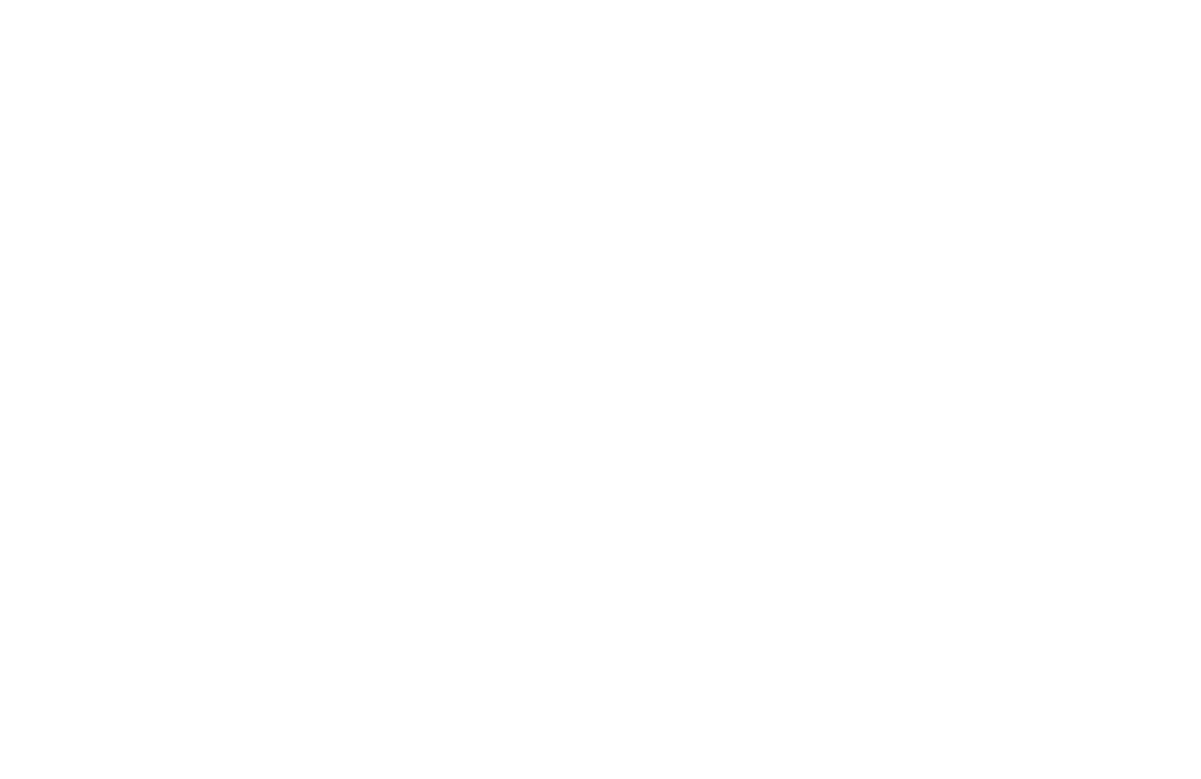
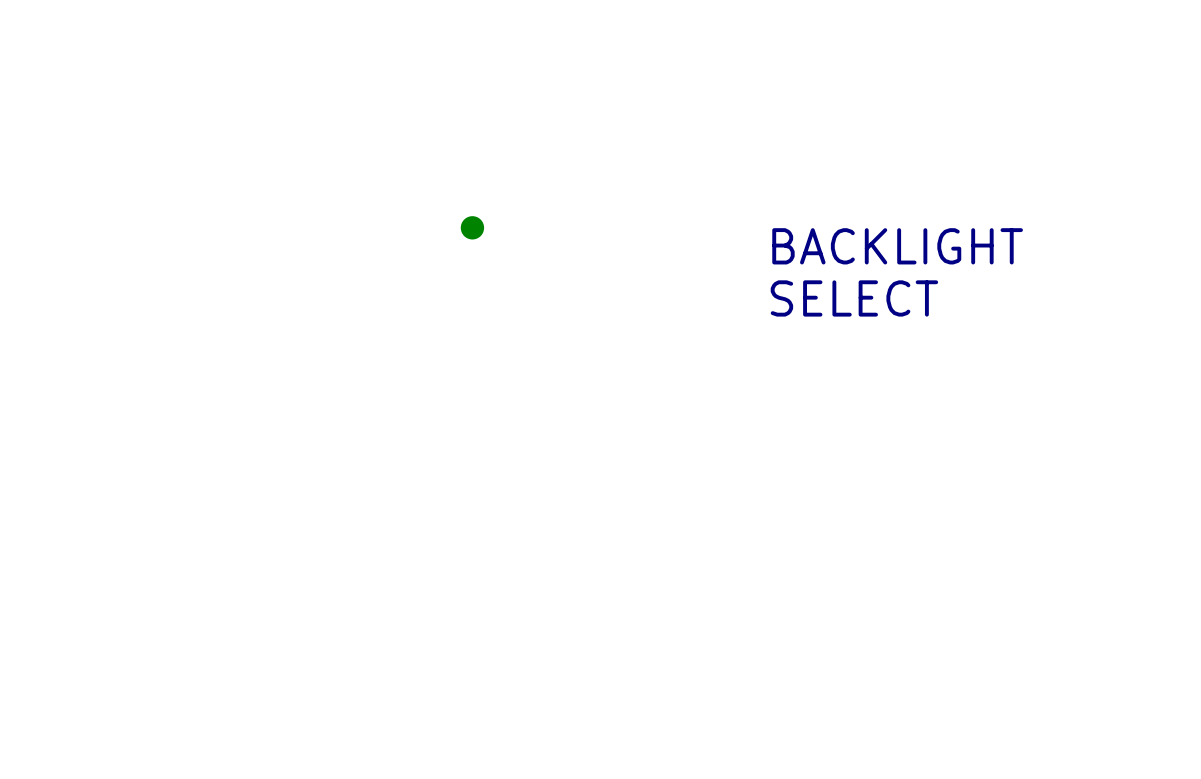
junction: none -> (472, 227)
text: none -> BACKLIGHT (897, 246)
text: none -> SELECT (854, 298)

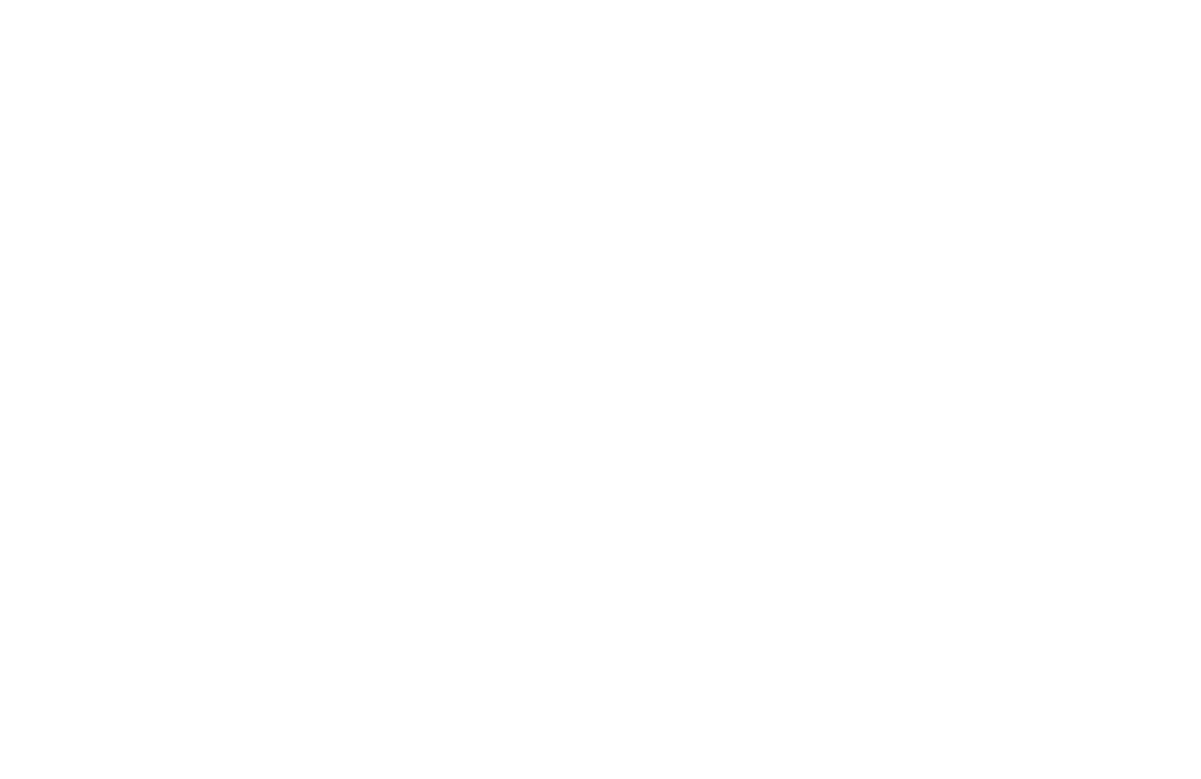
junction: (472, 227) -> none
text: BACKLIGHT (897, 246) -> none
text: SELECT (854, 298) -> none

